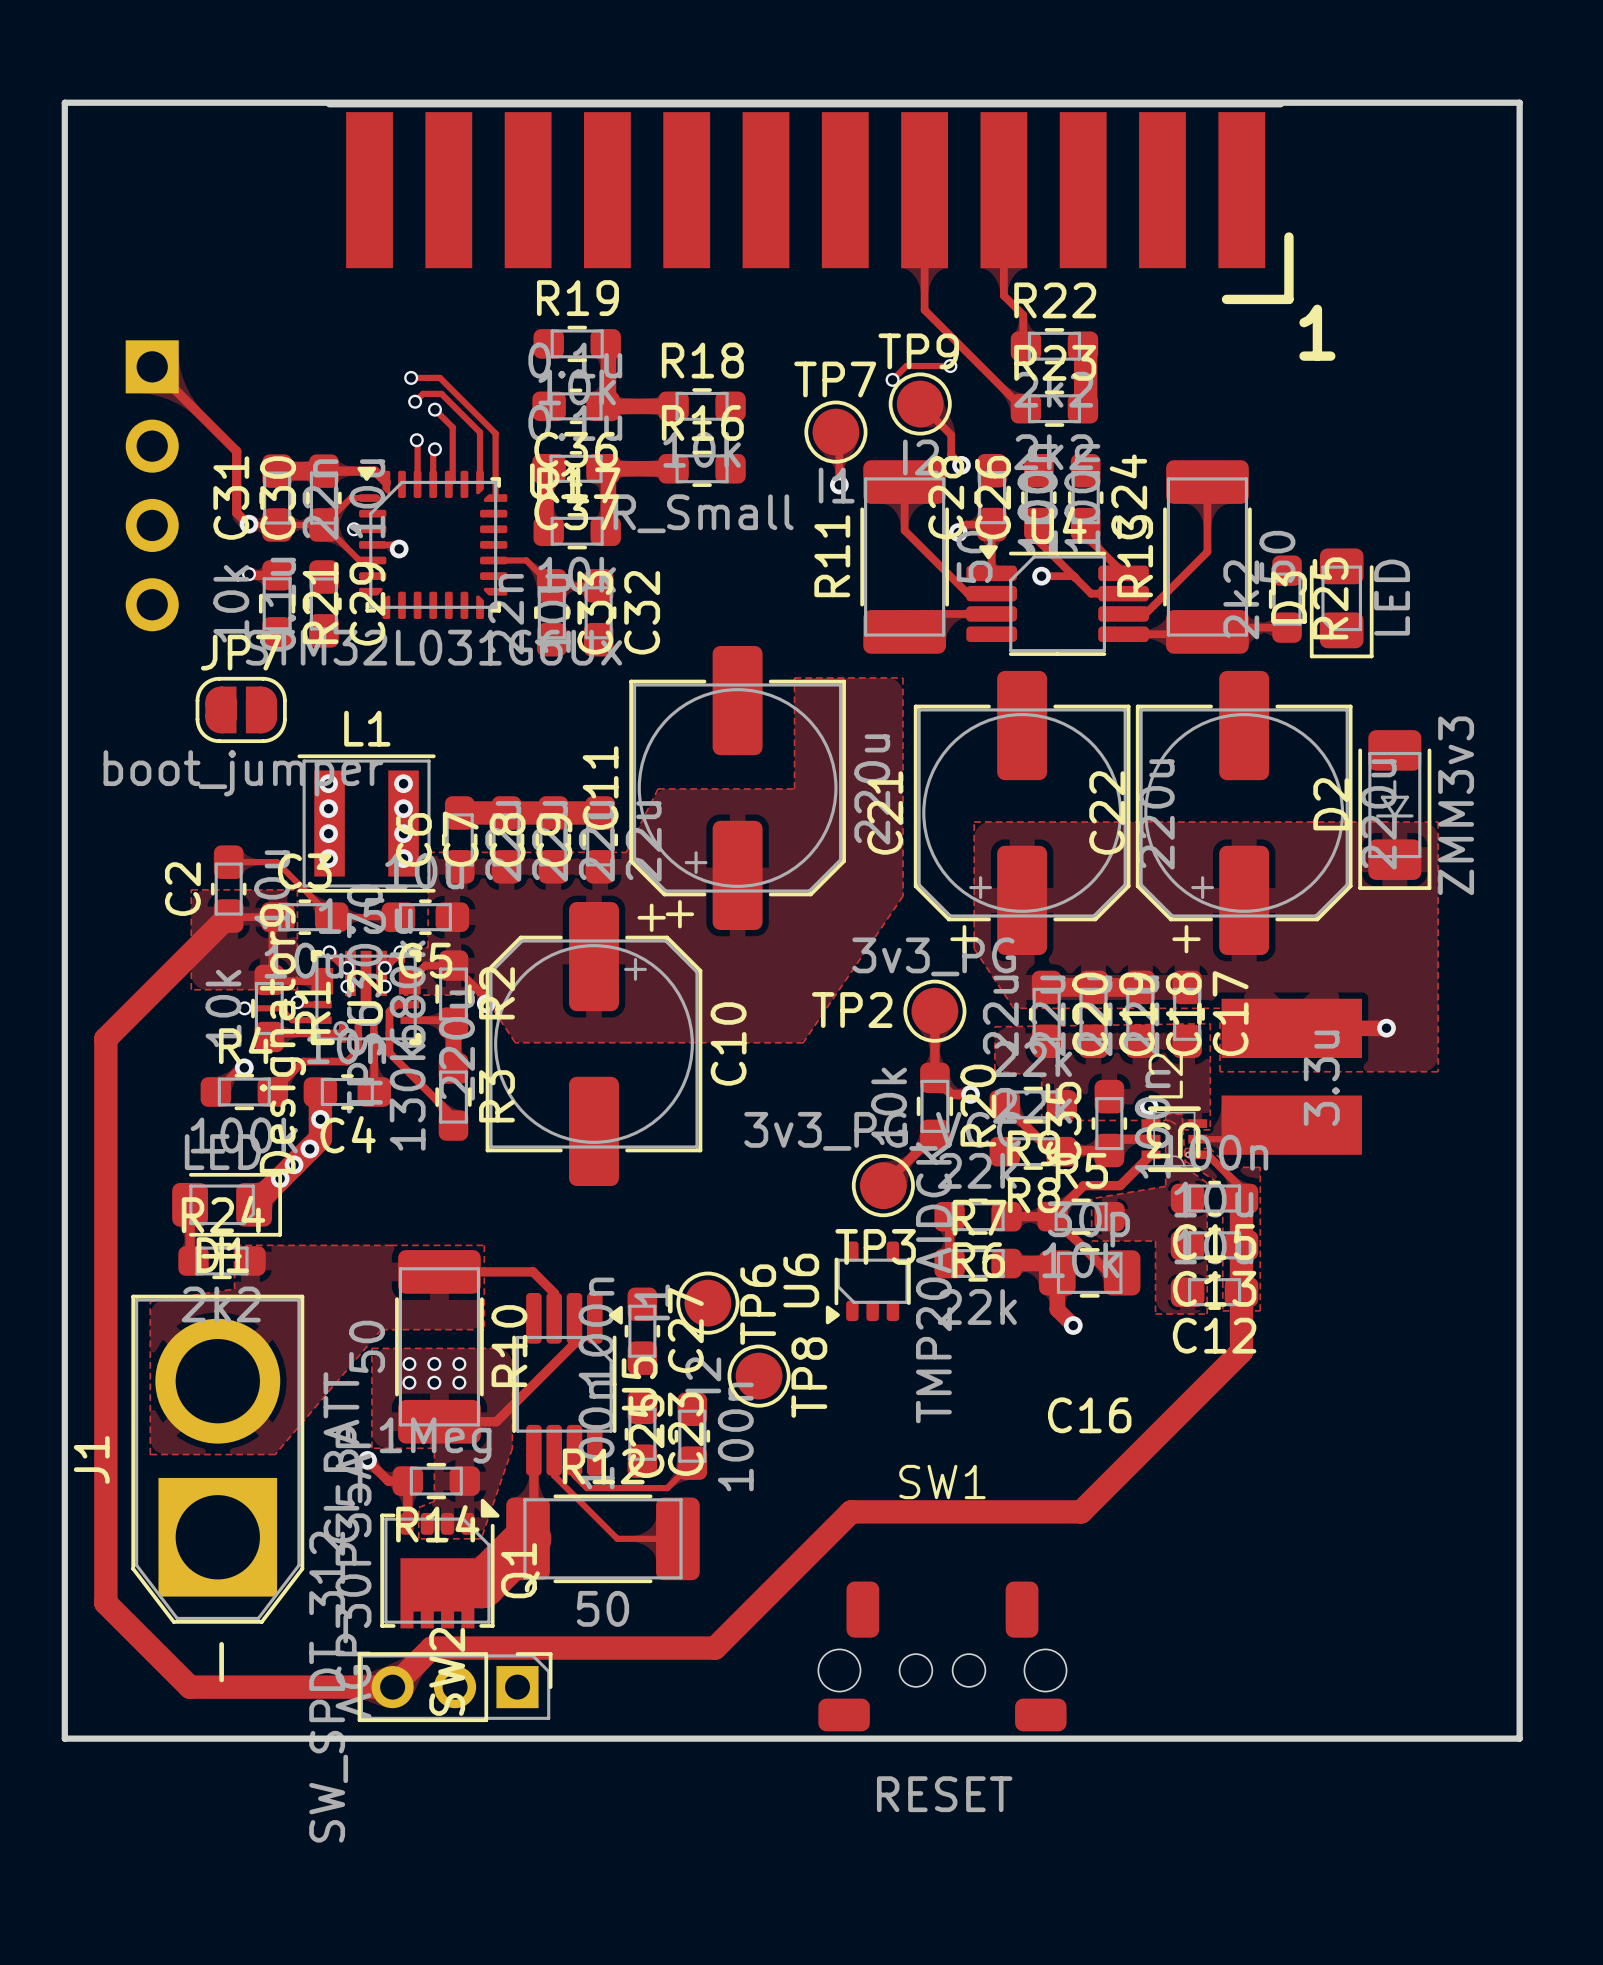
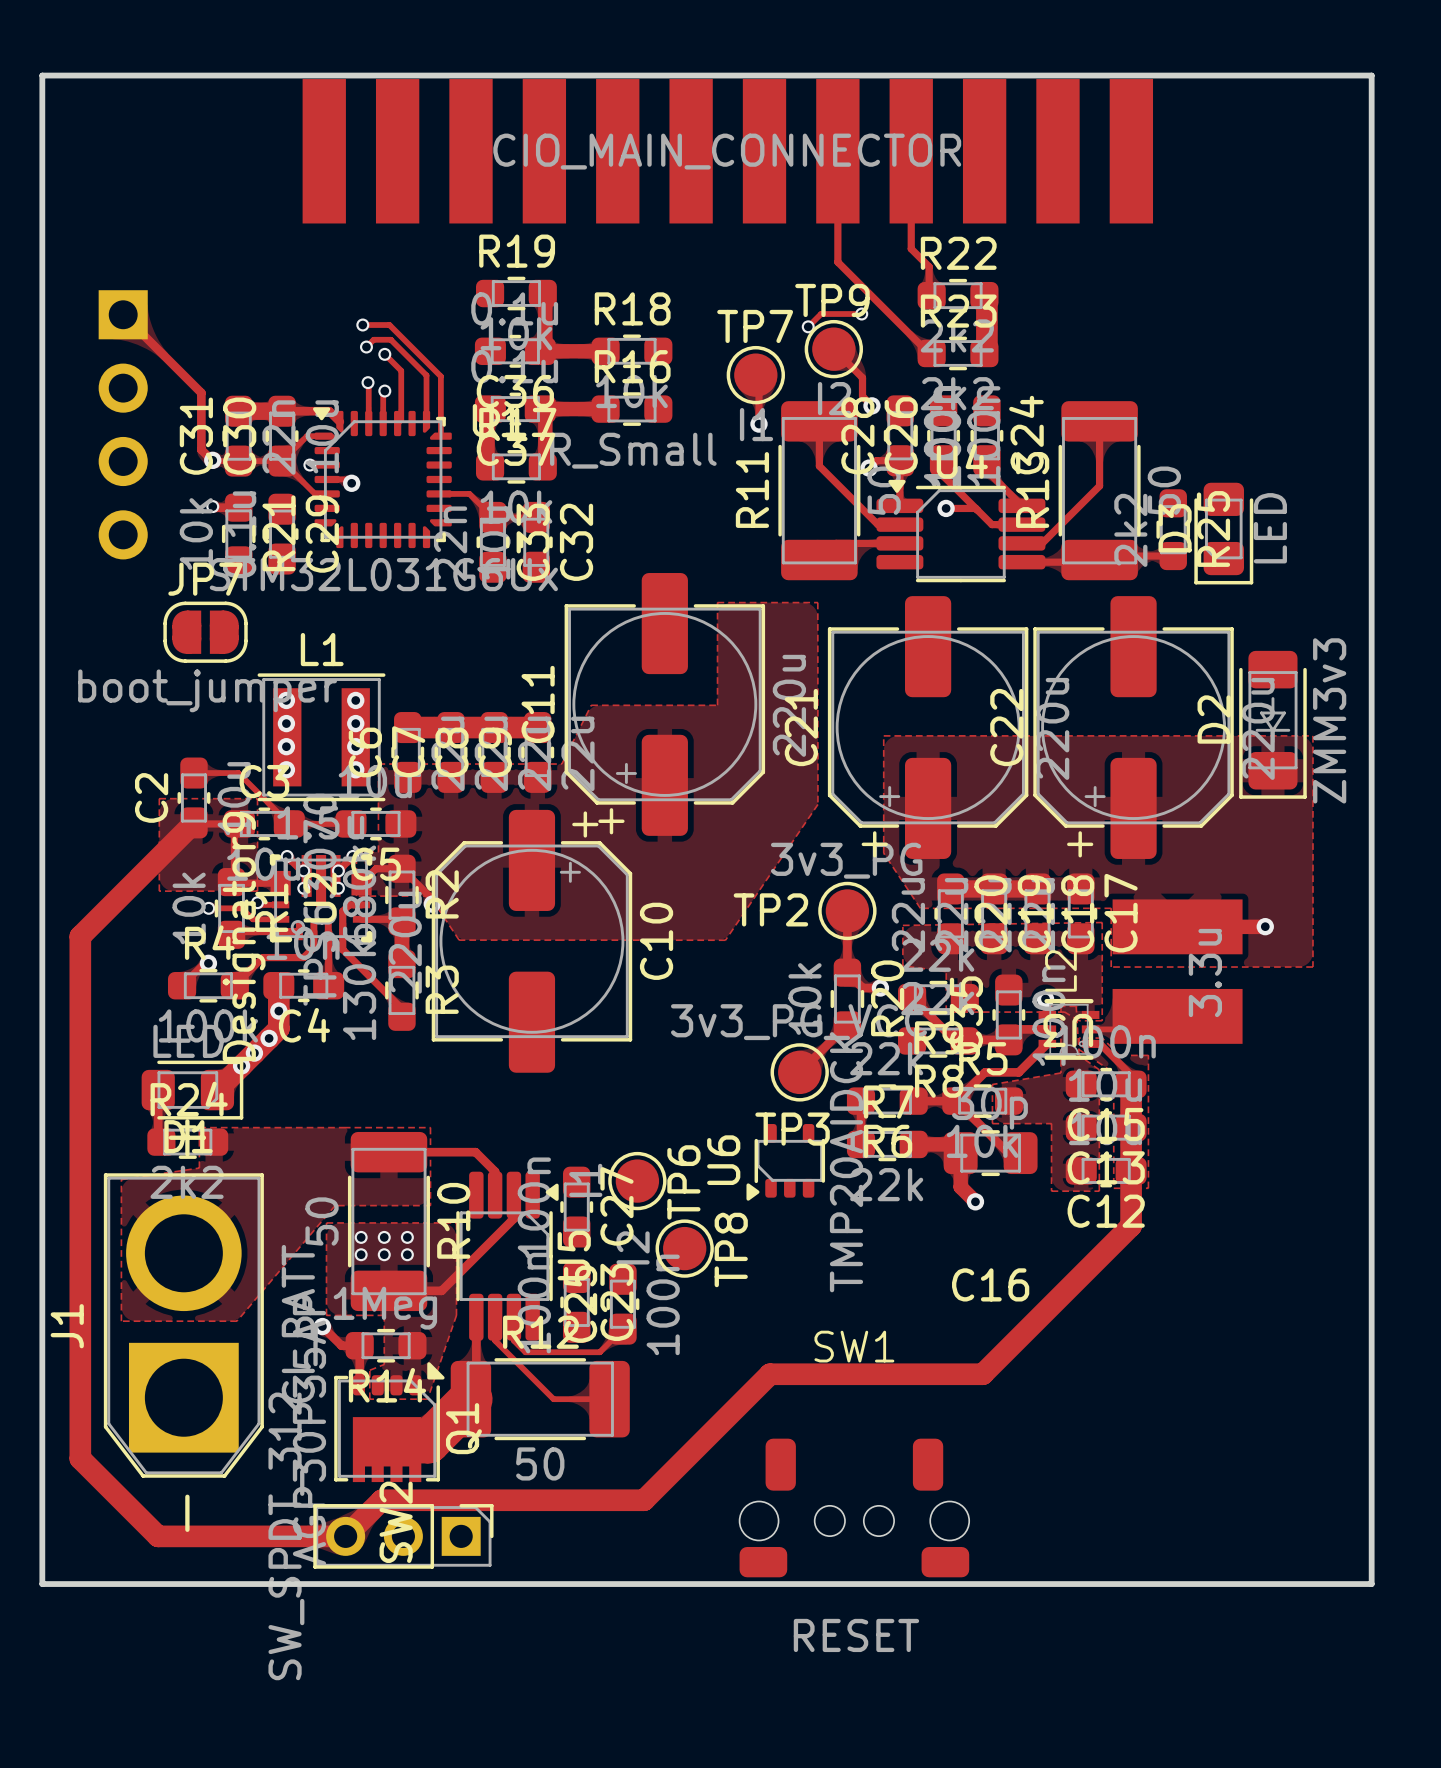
board edge: (64, 108) (64, 102) (1519, 102) (1519, 1738) (1501, 1738) -> (42, 75) (1371, 75) (1371, 1584)
part side: top (809, 202) -> bottom (727, 151)

